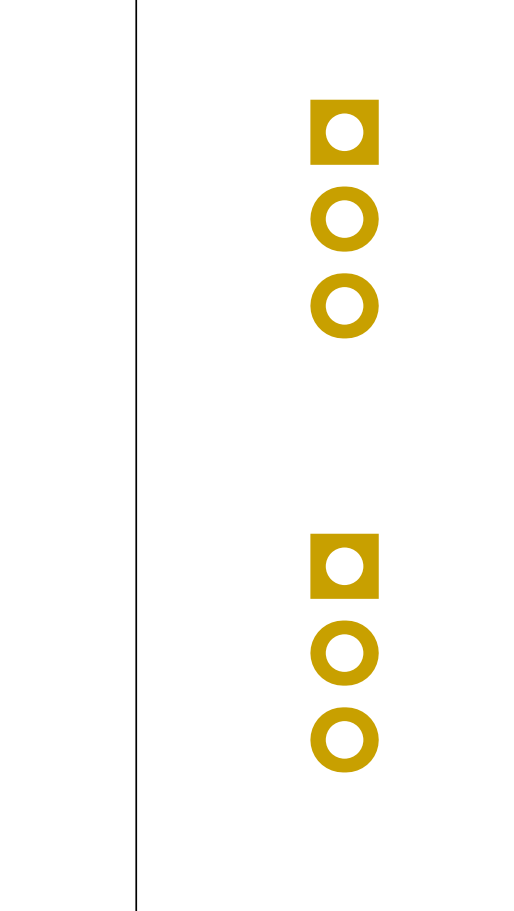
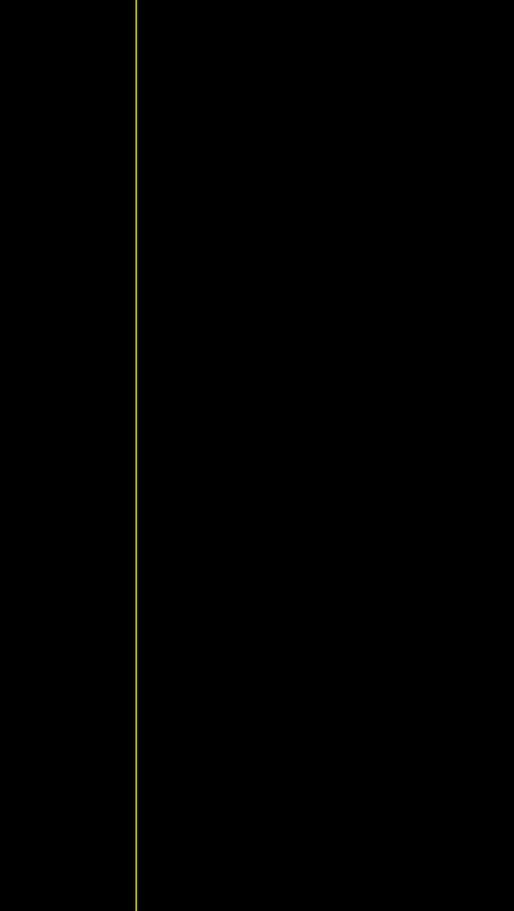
part: (344, 219) -> none
part: (344, 653) -> none

